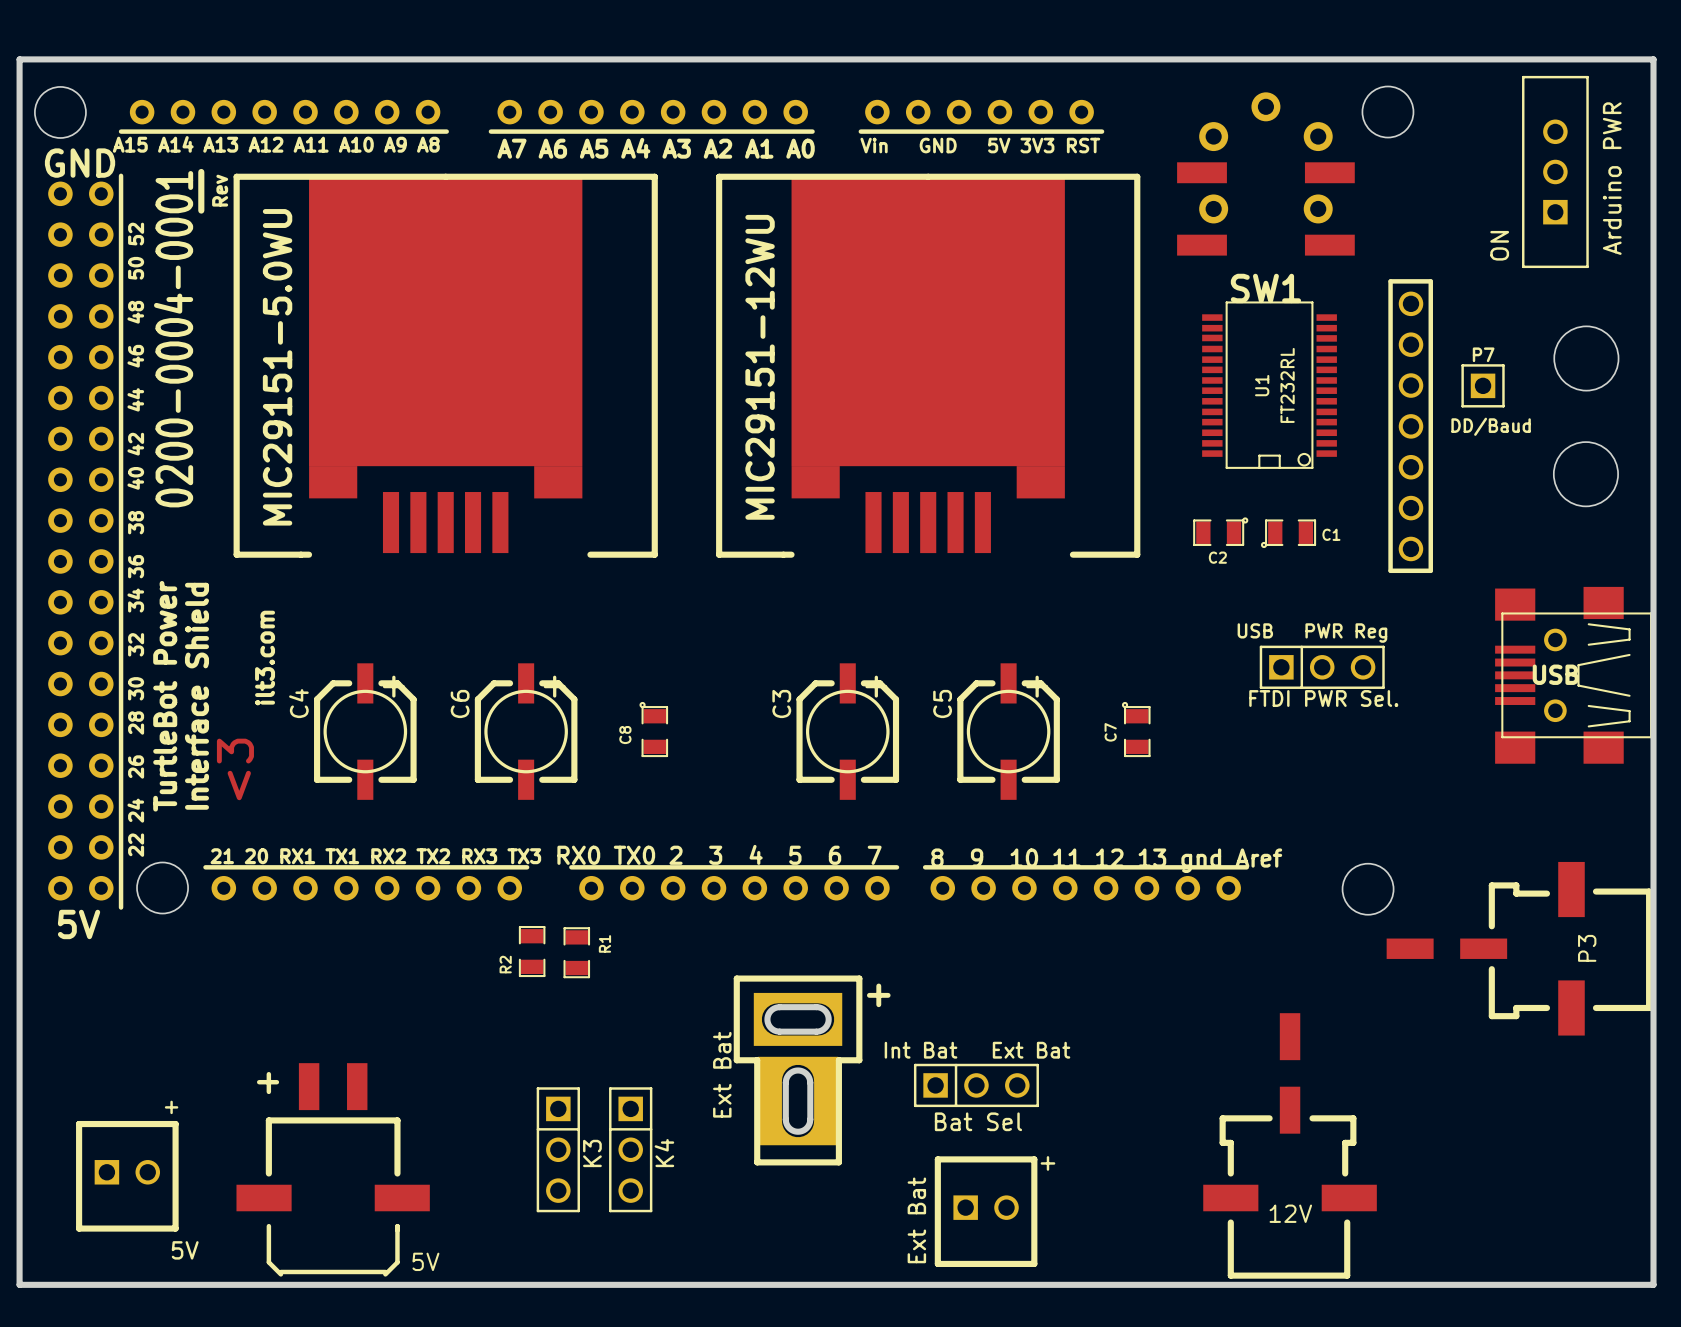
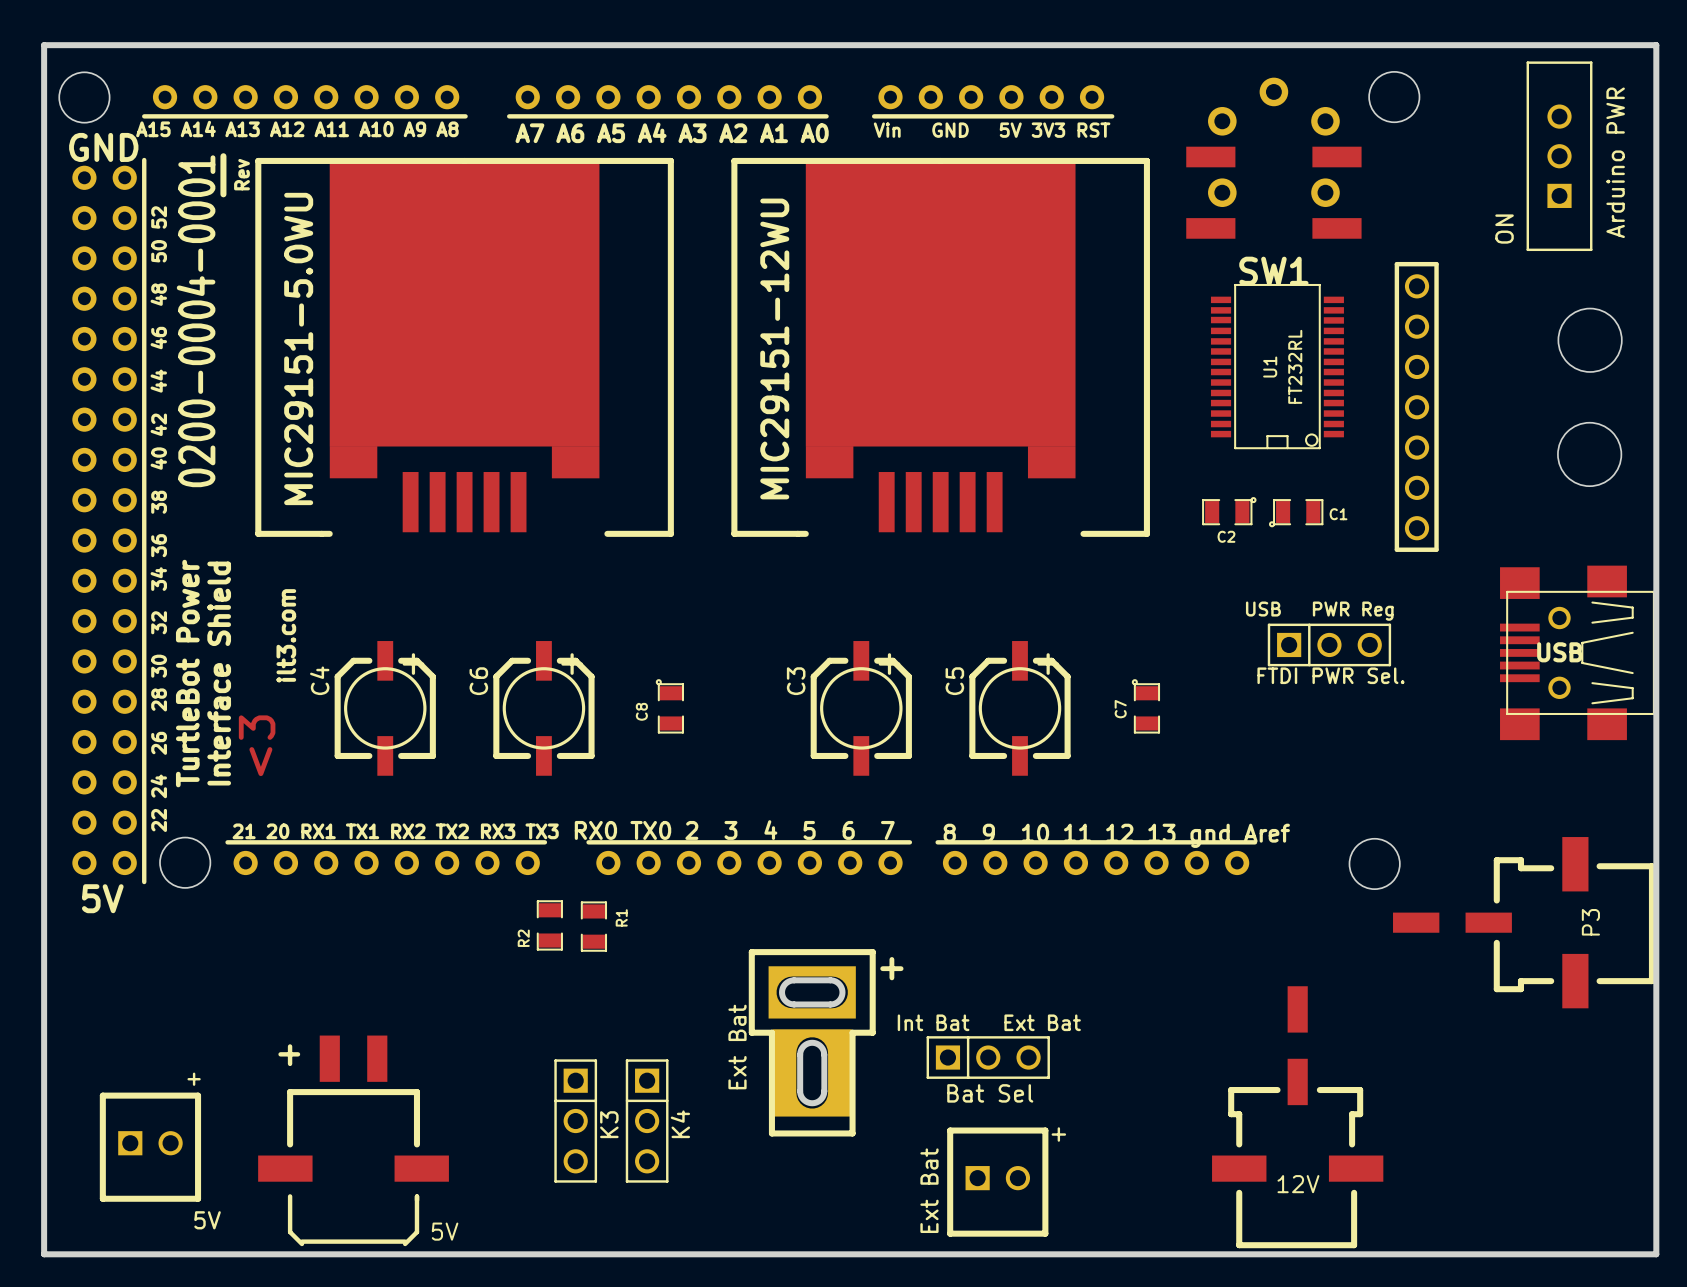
P7: DD/Baud (1483, 385) -> none

